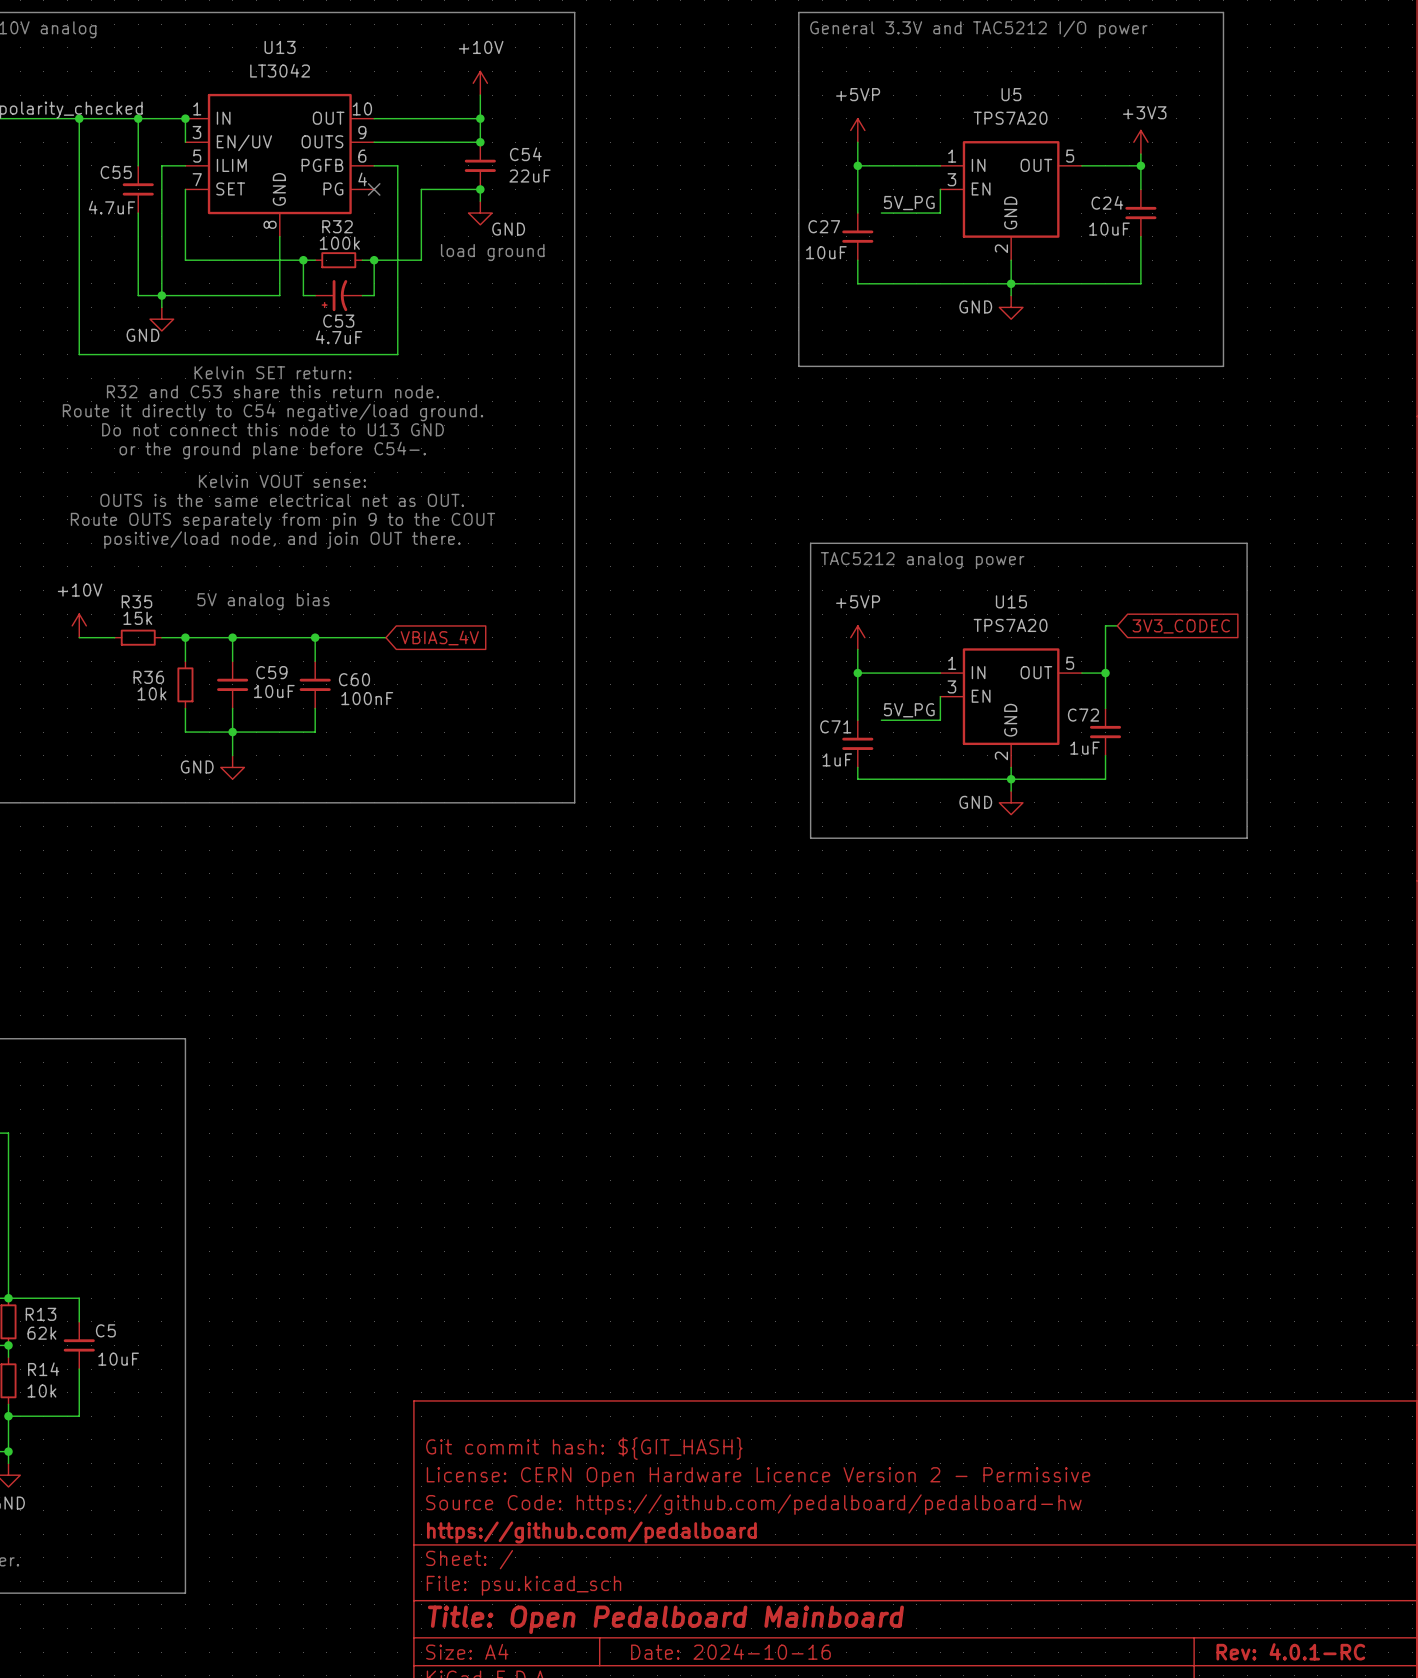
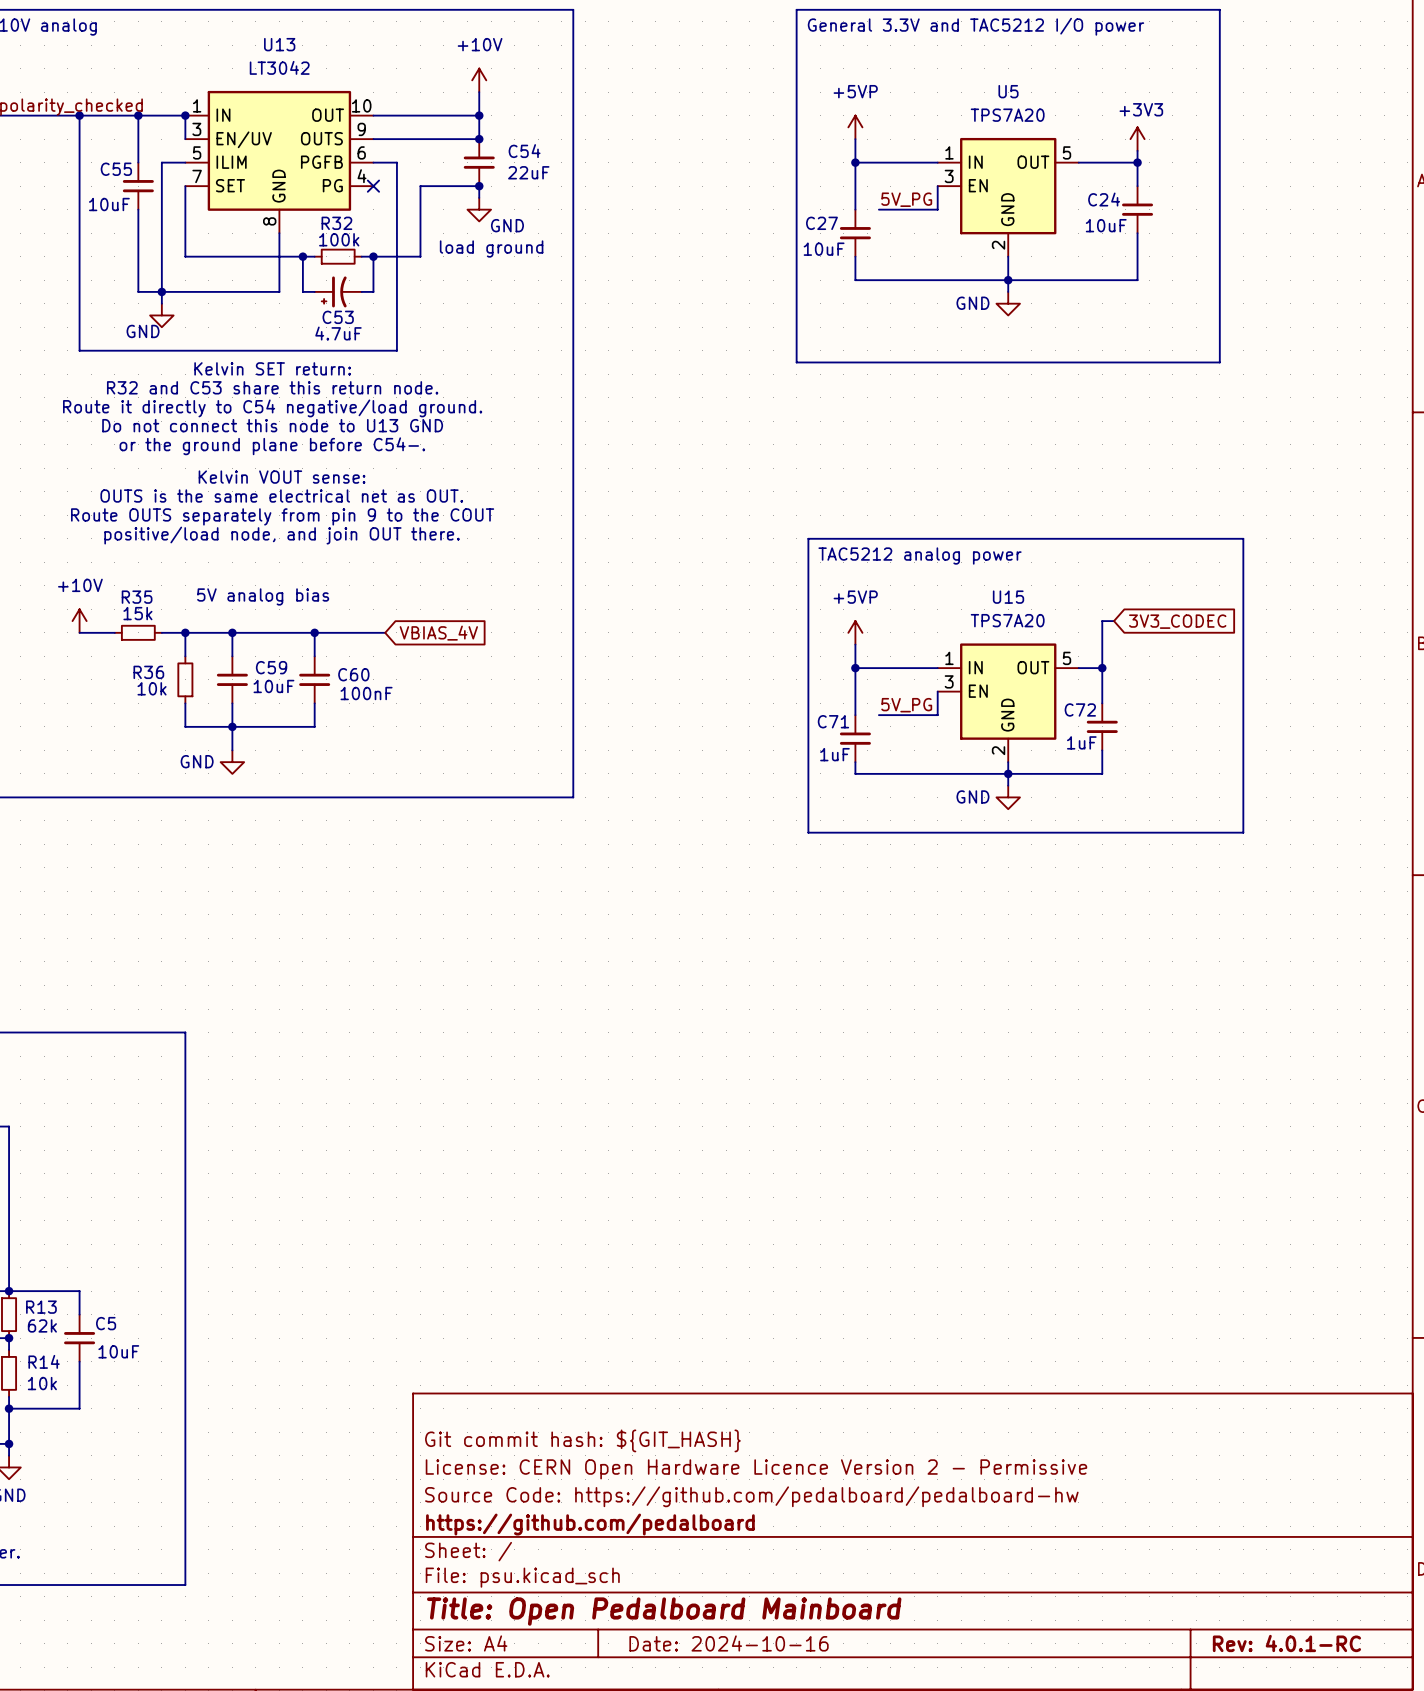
C55 value: 4.7uF (111, 207) -> 10uF (109, 204)

